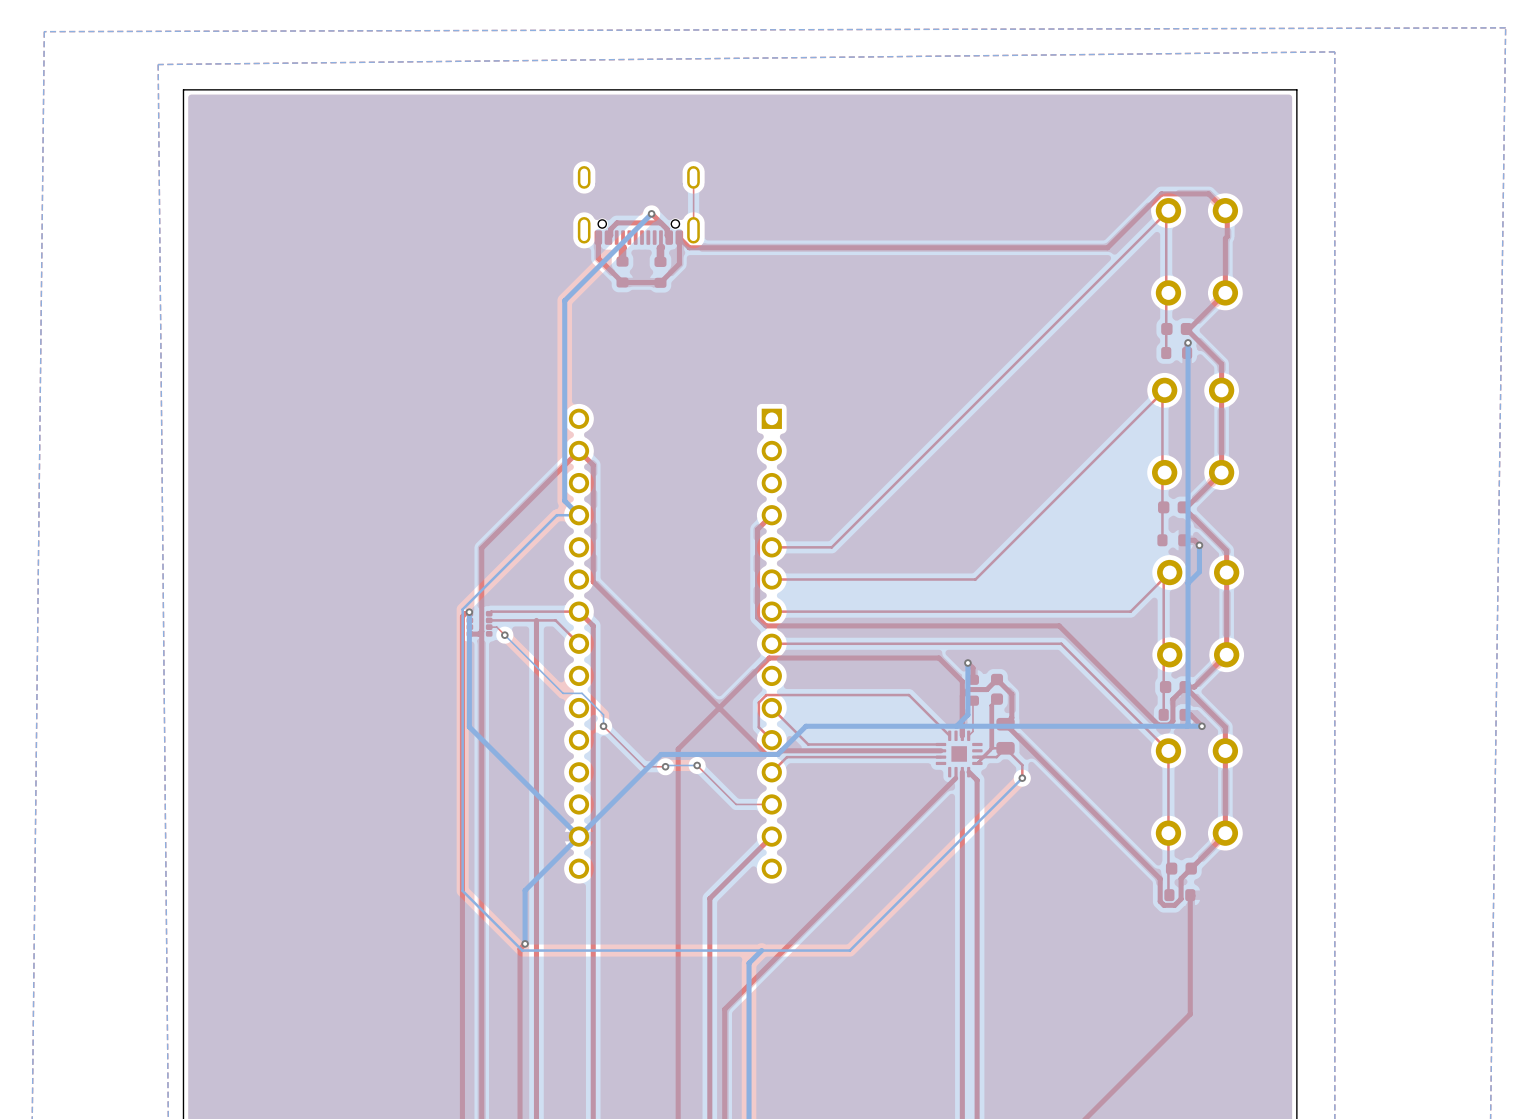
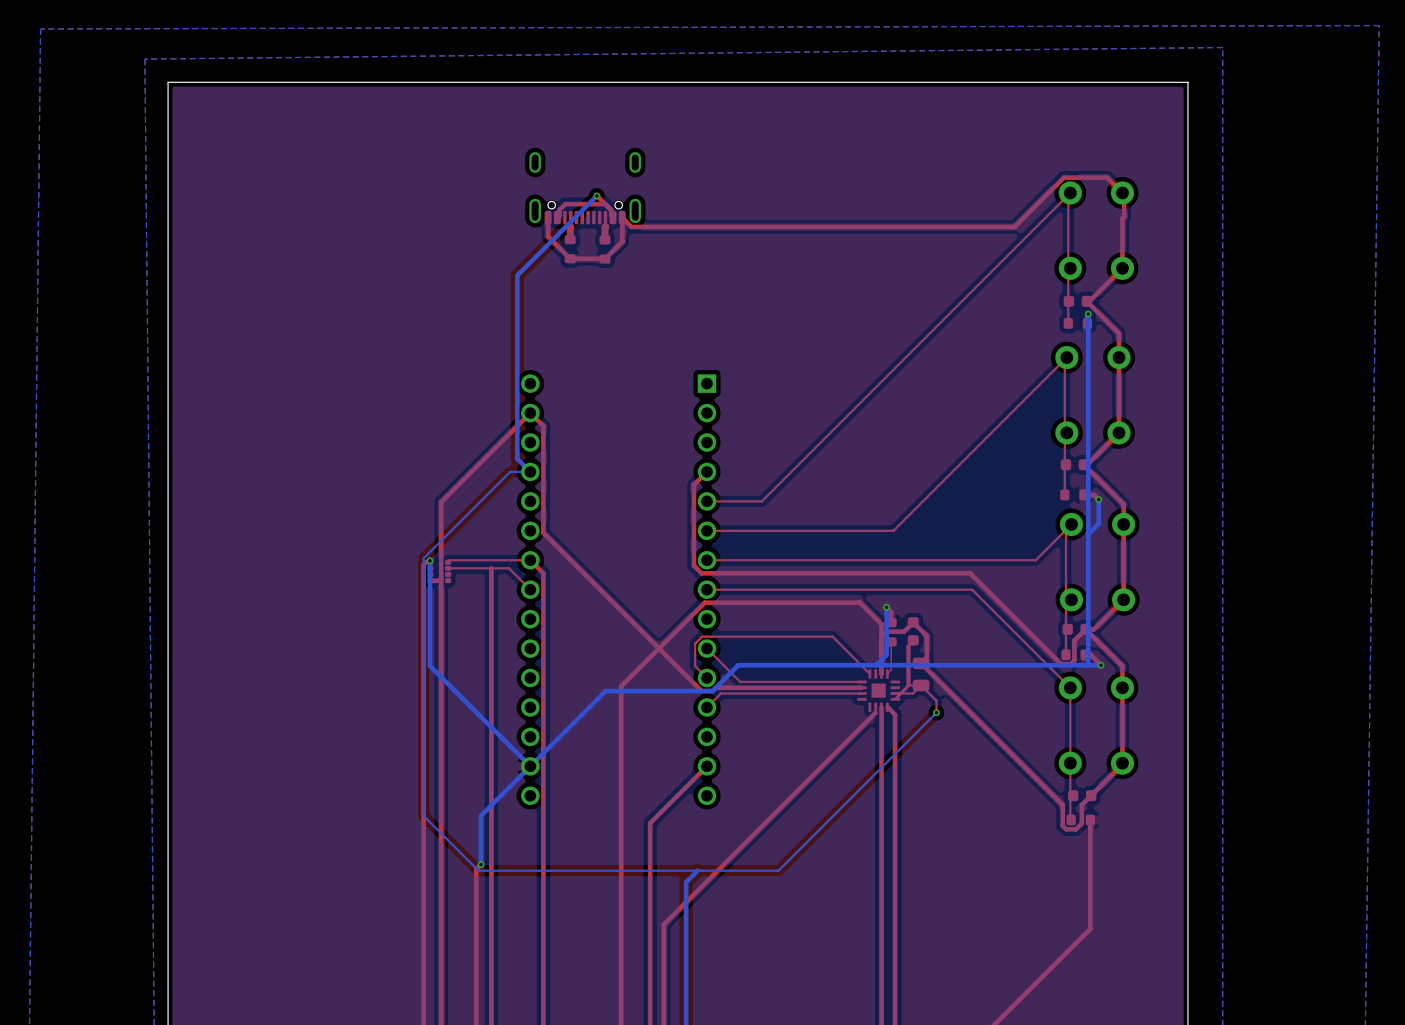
top track: (693, 177) (690, 179) (693, 182) (693, 230) -> none
top track: (489, 627) (496, 627) (504, 635) -> none
bottom track: (504, 635) (563, 693) (582, 693) (603, 714) (603, 726) -> none
via: (504, 635) -> none
top track: (603, 726) (644, 766) (665, 766) -> none
via: (603, 726) -> none
top track: (697, 765) (736, 804) (771, 804) -> none
bottom track: (697, 765) (665, 766) -> none
via: (697, 765) -> none
via: (665, 766) -> none

